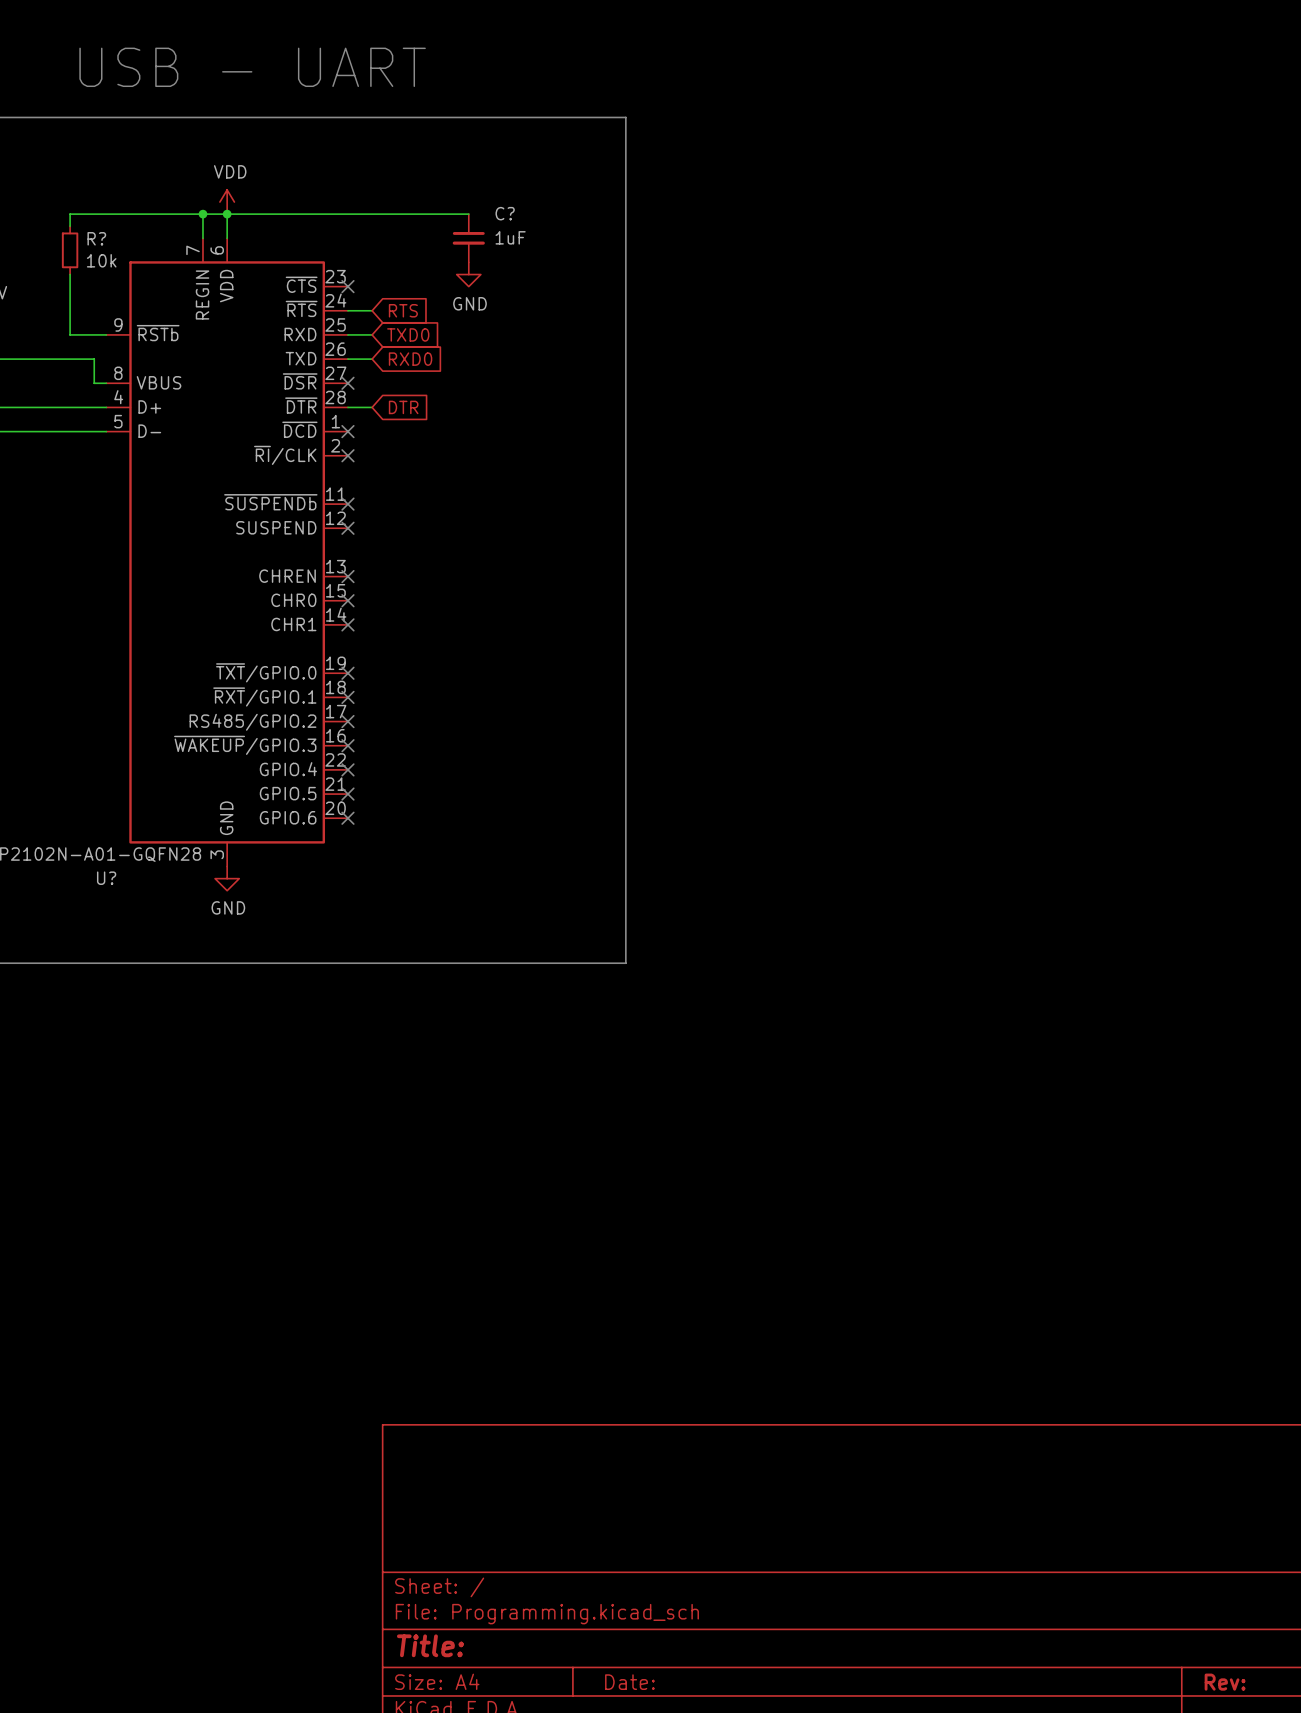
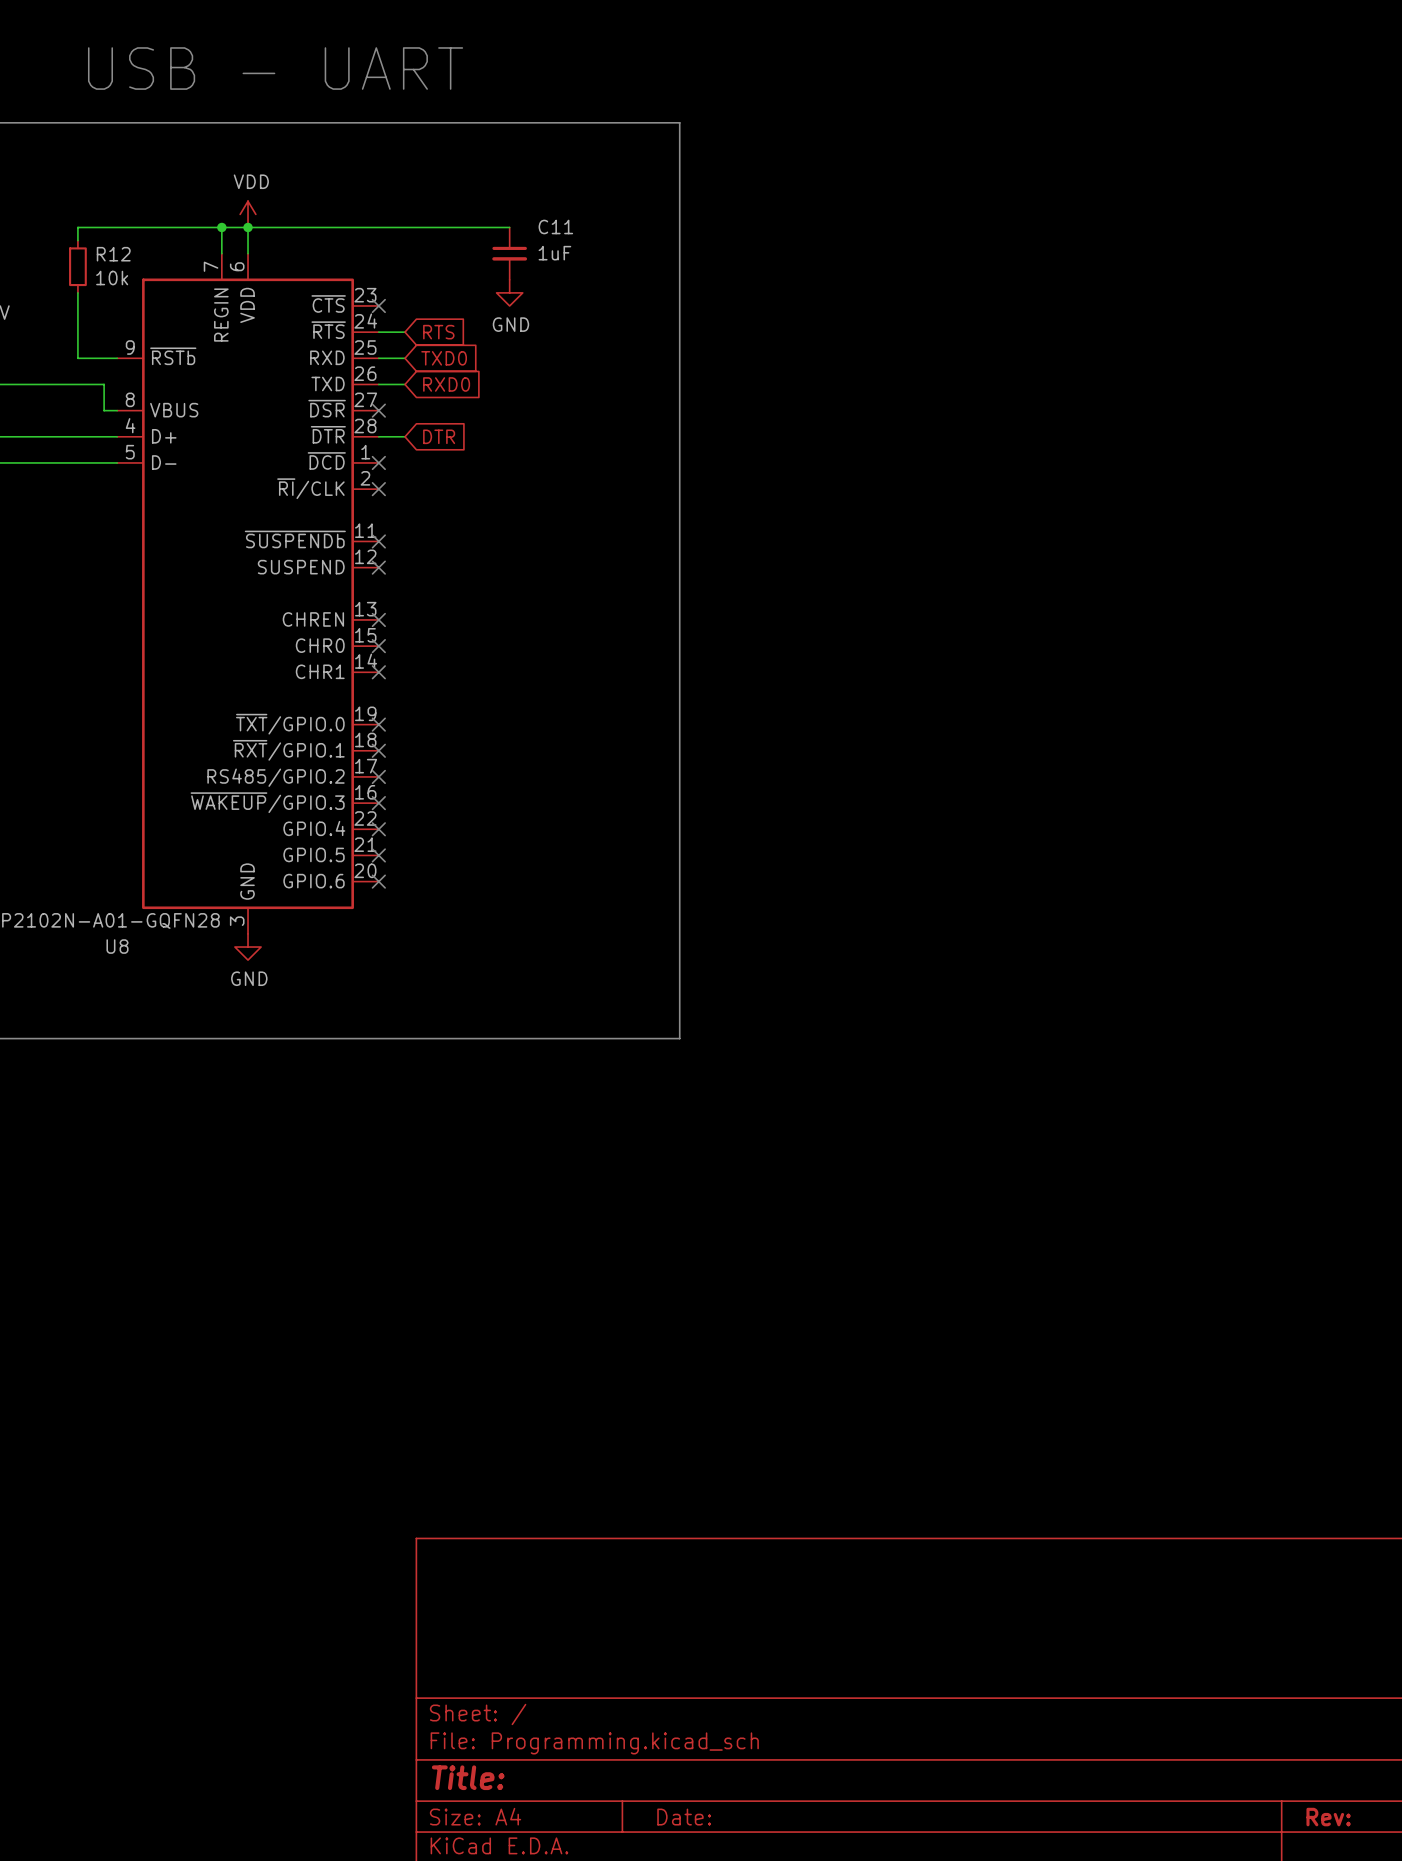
C? name: C? (505, 213) -> C11 (555, 226)
R? name: R? (96, 238) -> R12 (113, 254)
U? name: U? (106, 878) -> U8 (117, 946)

